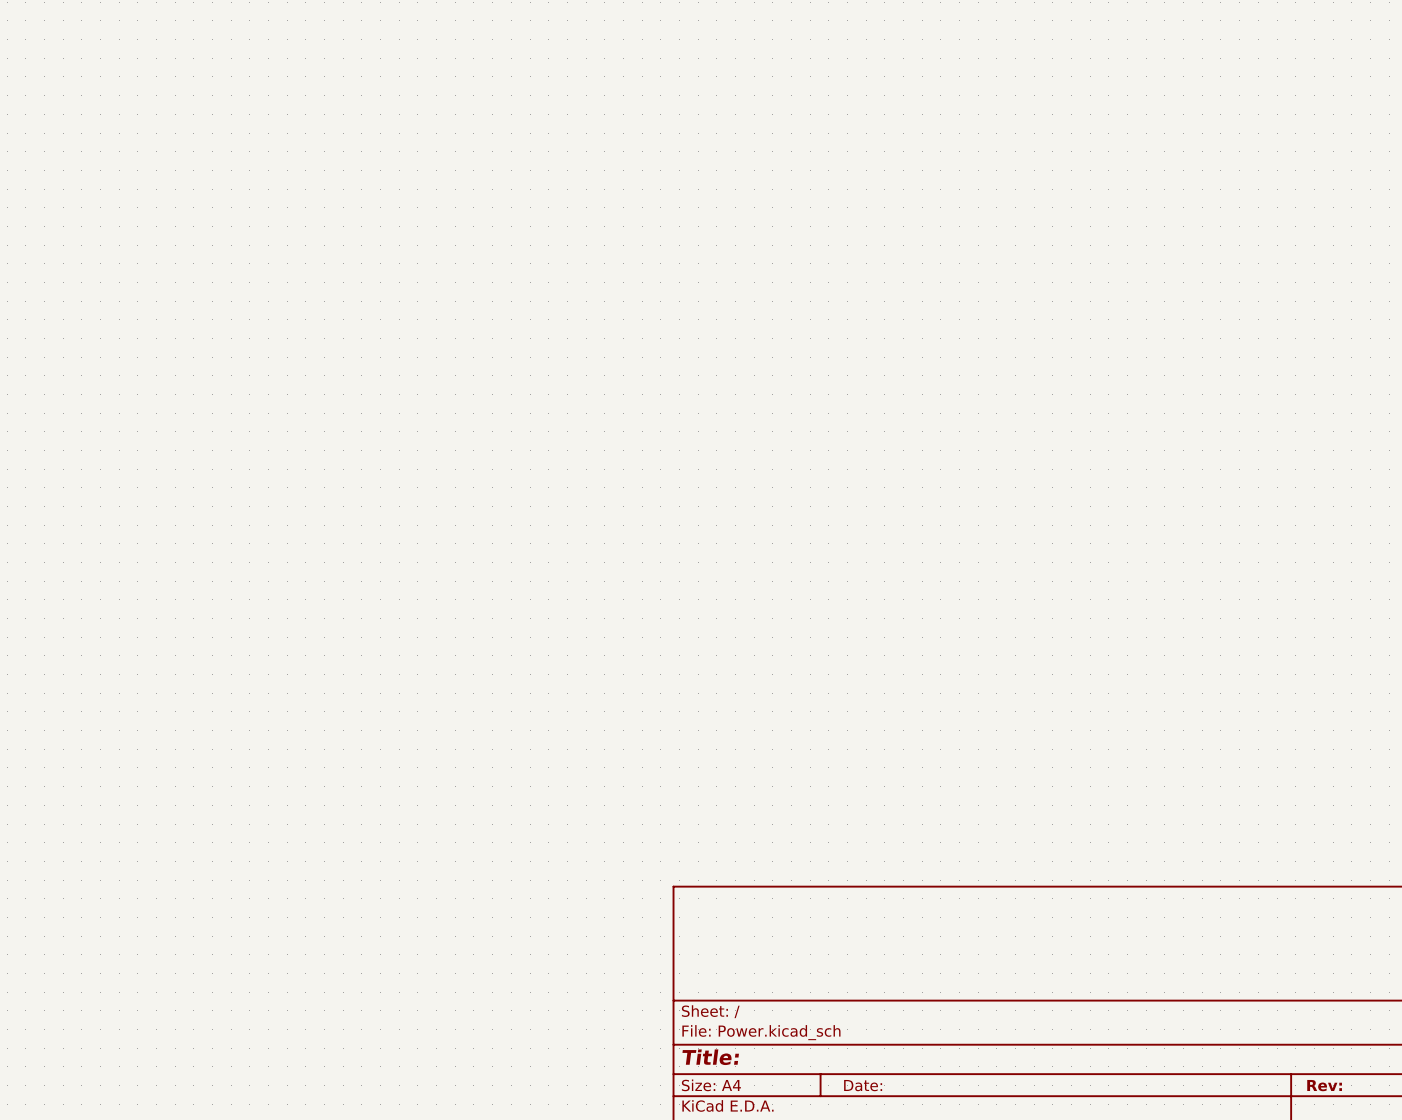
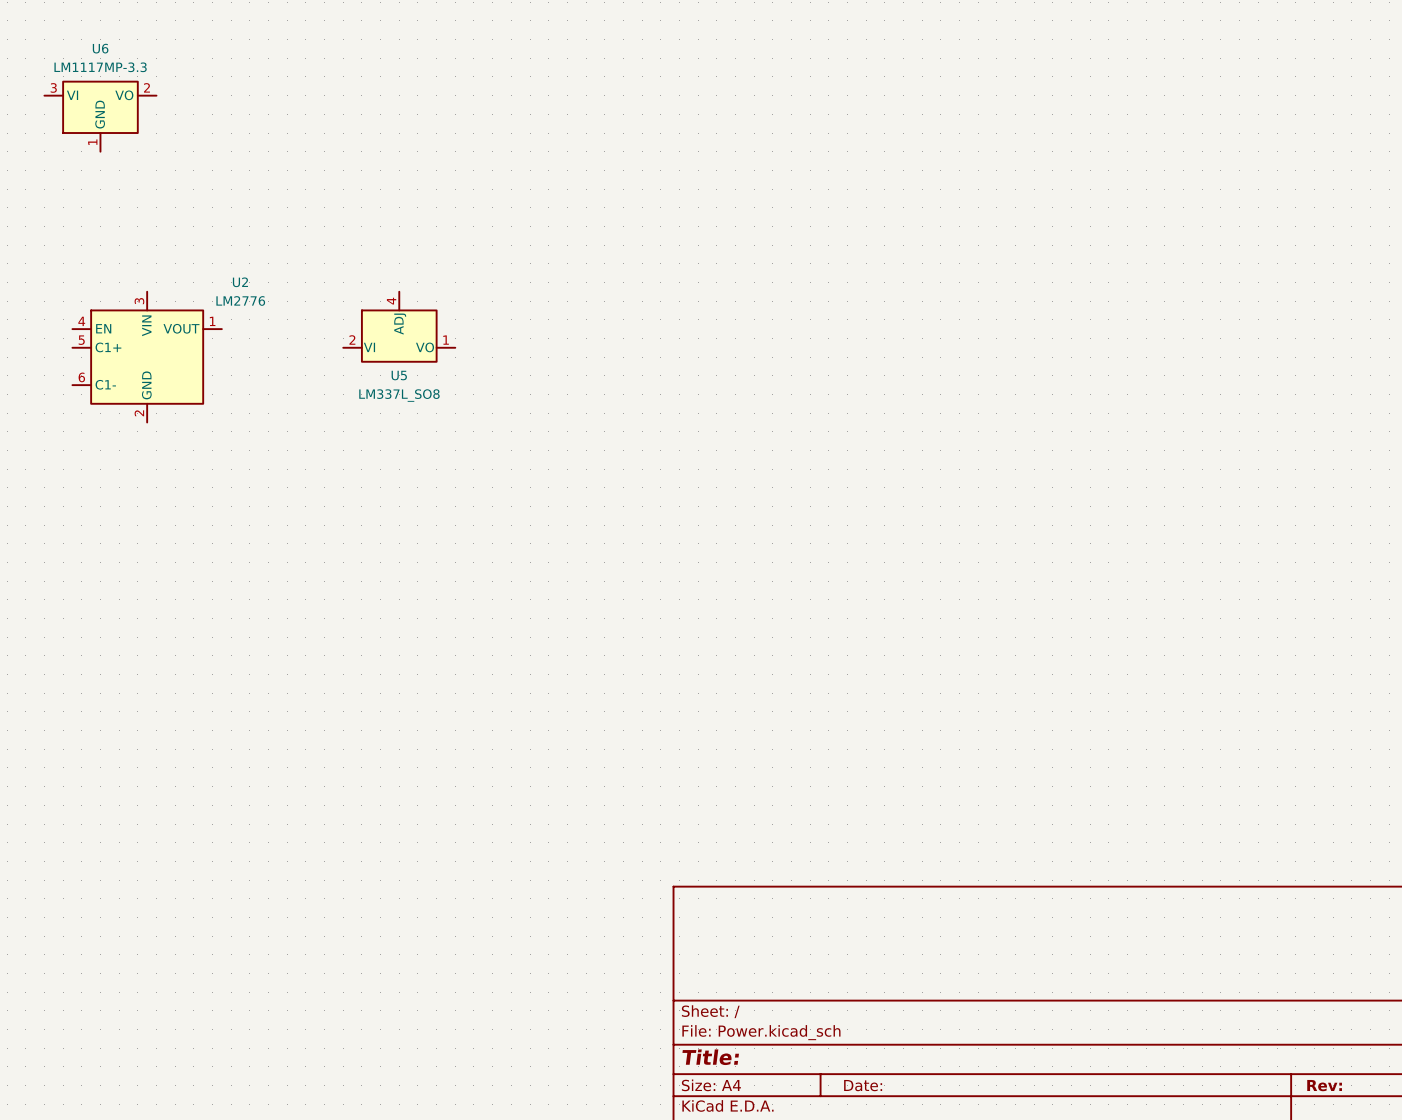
U6: none -> LM1117MP-3.3 (100, 116)
U5: none -> LM337L_SO8 (399, 327)
U2: none -> LM2776 (147, 357)

